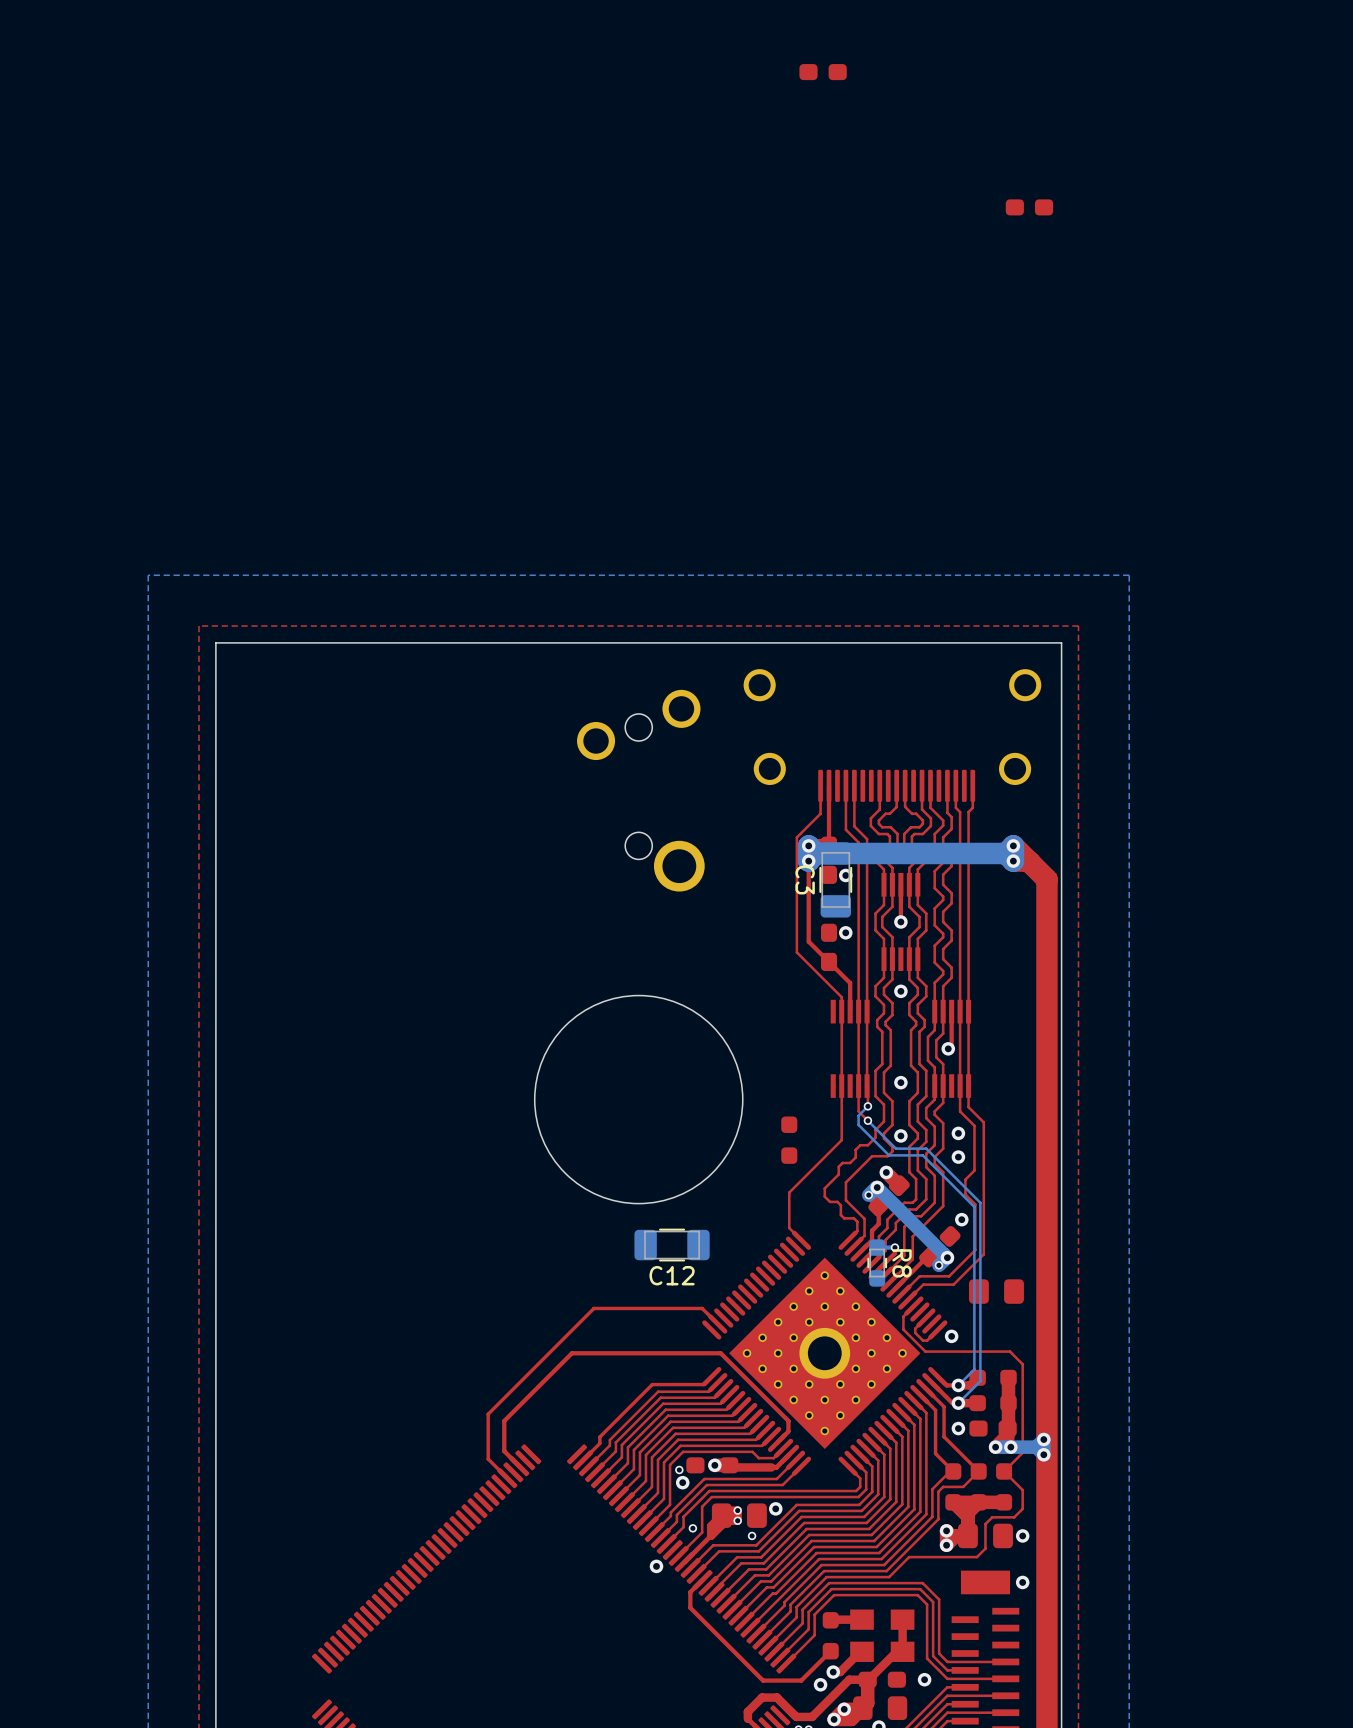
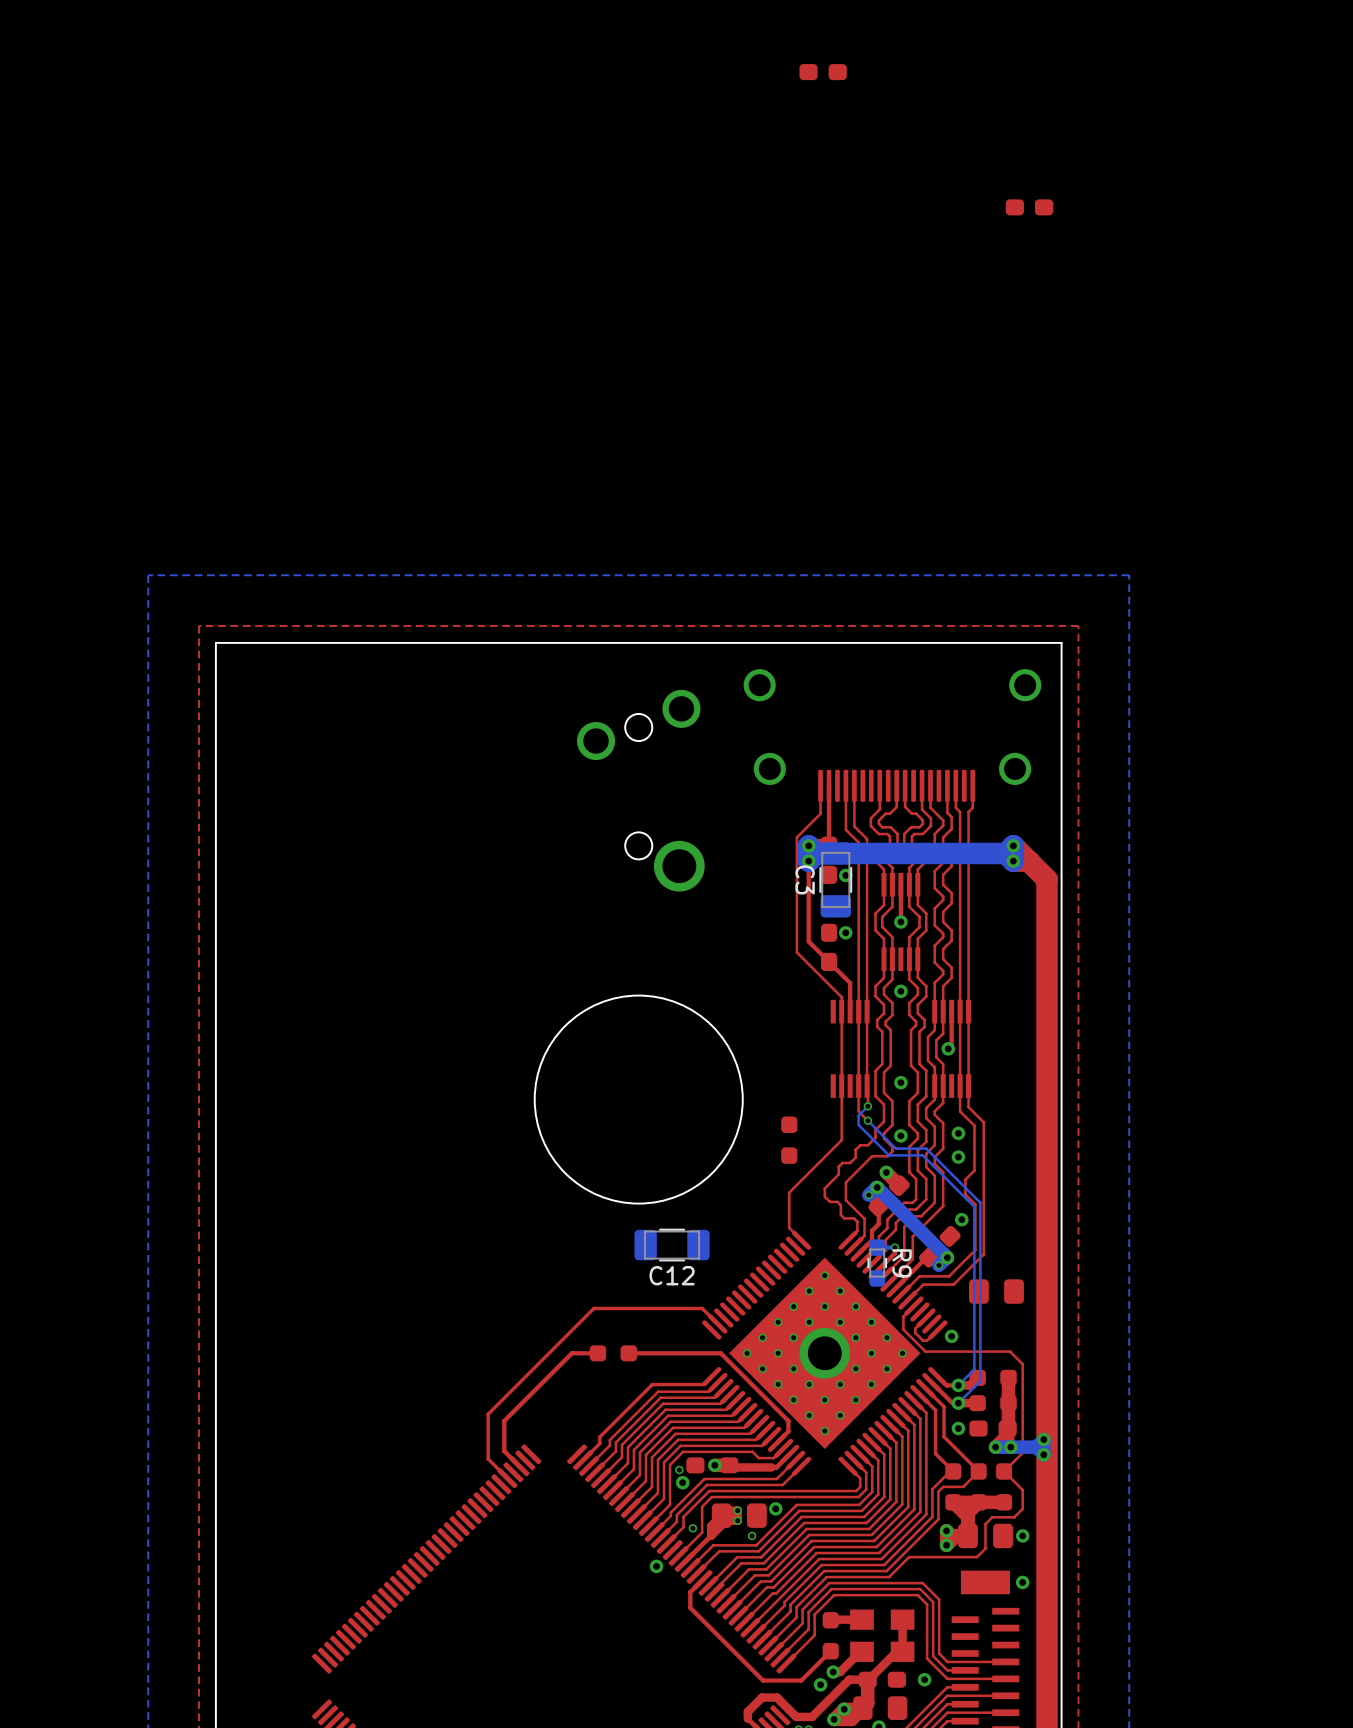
R8 name: R8 (902, 1263) -> R9 (902, 1263)
part: none -> (613, 1353)
top track: (628, 1353) (597, 1353) -> none

